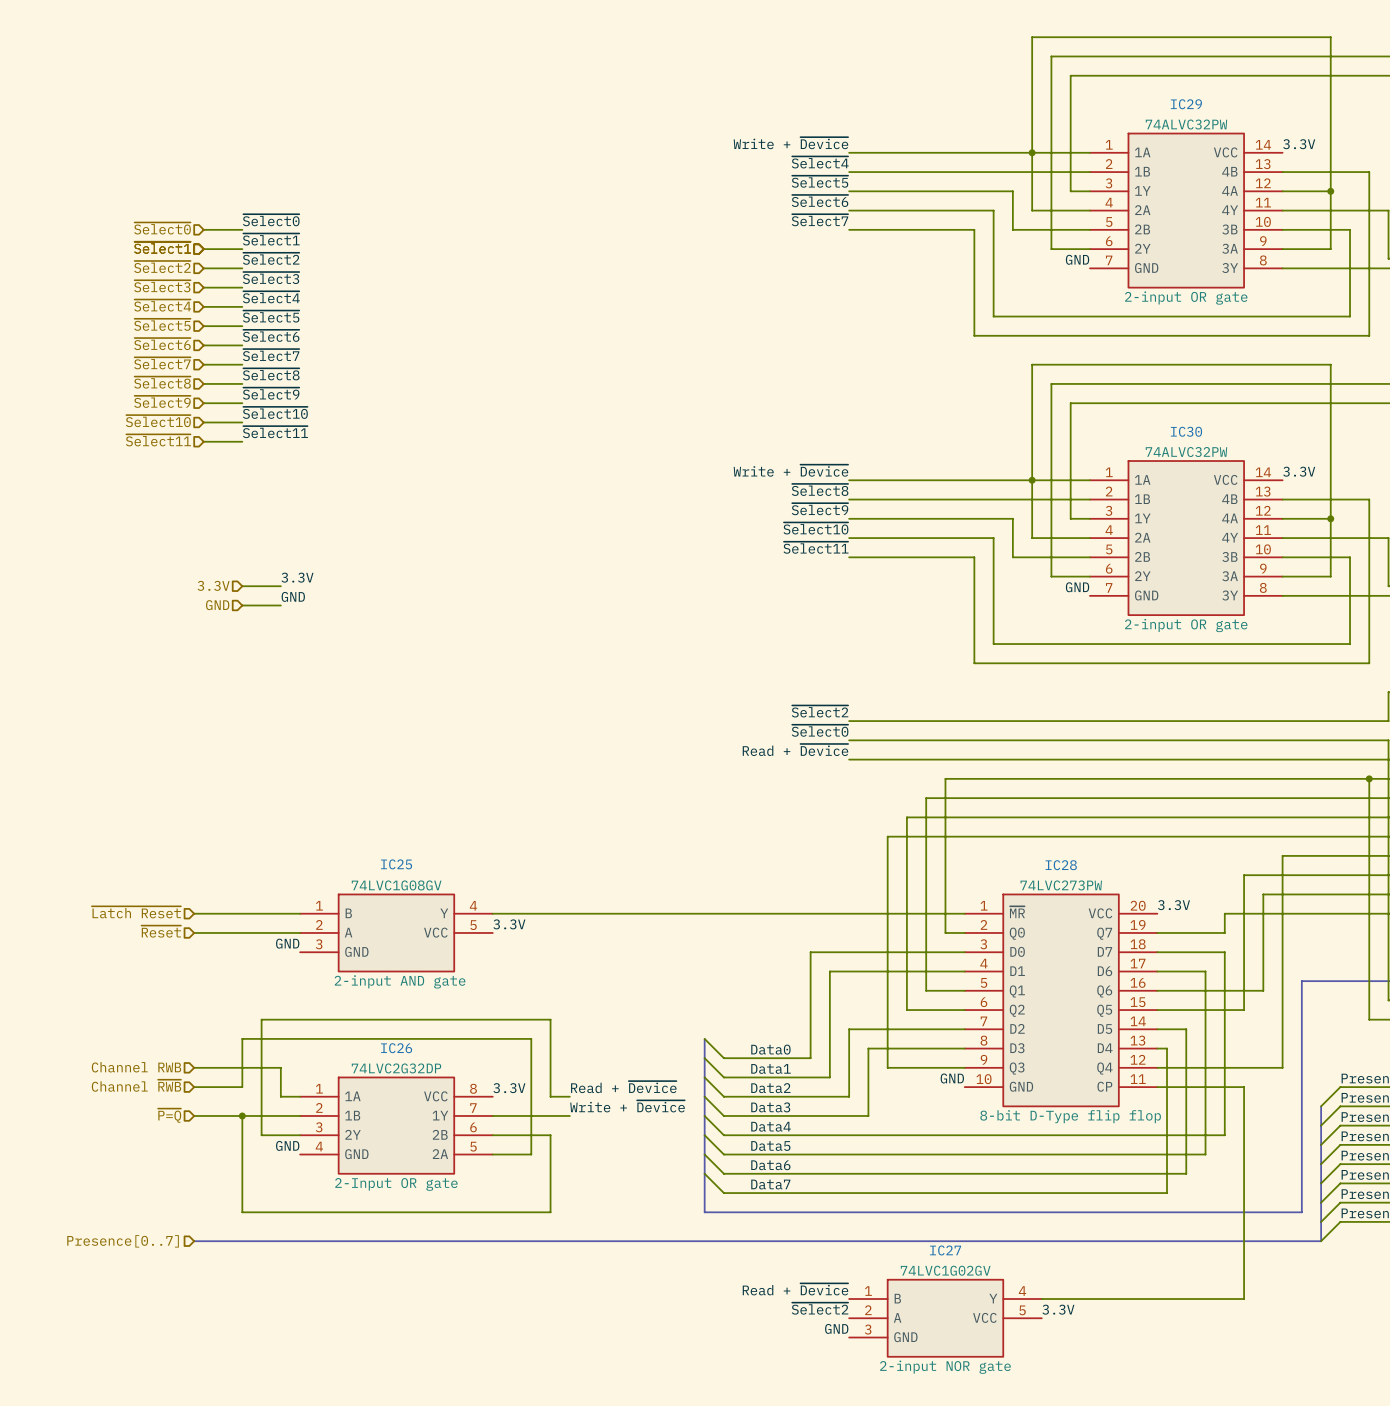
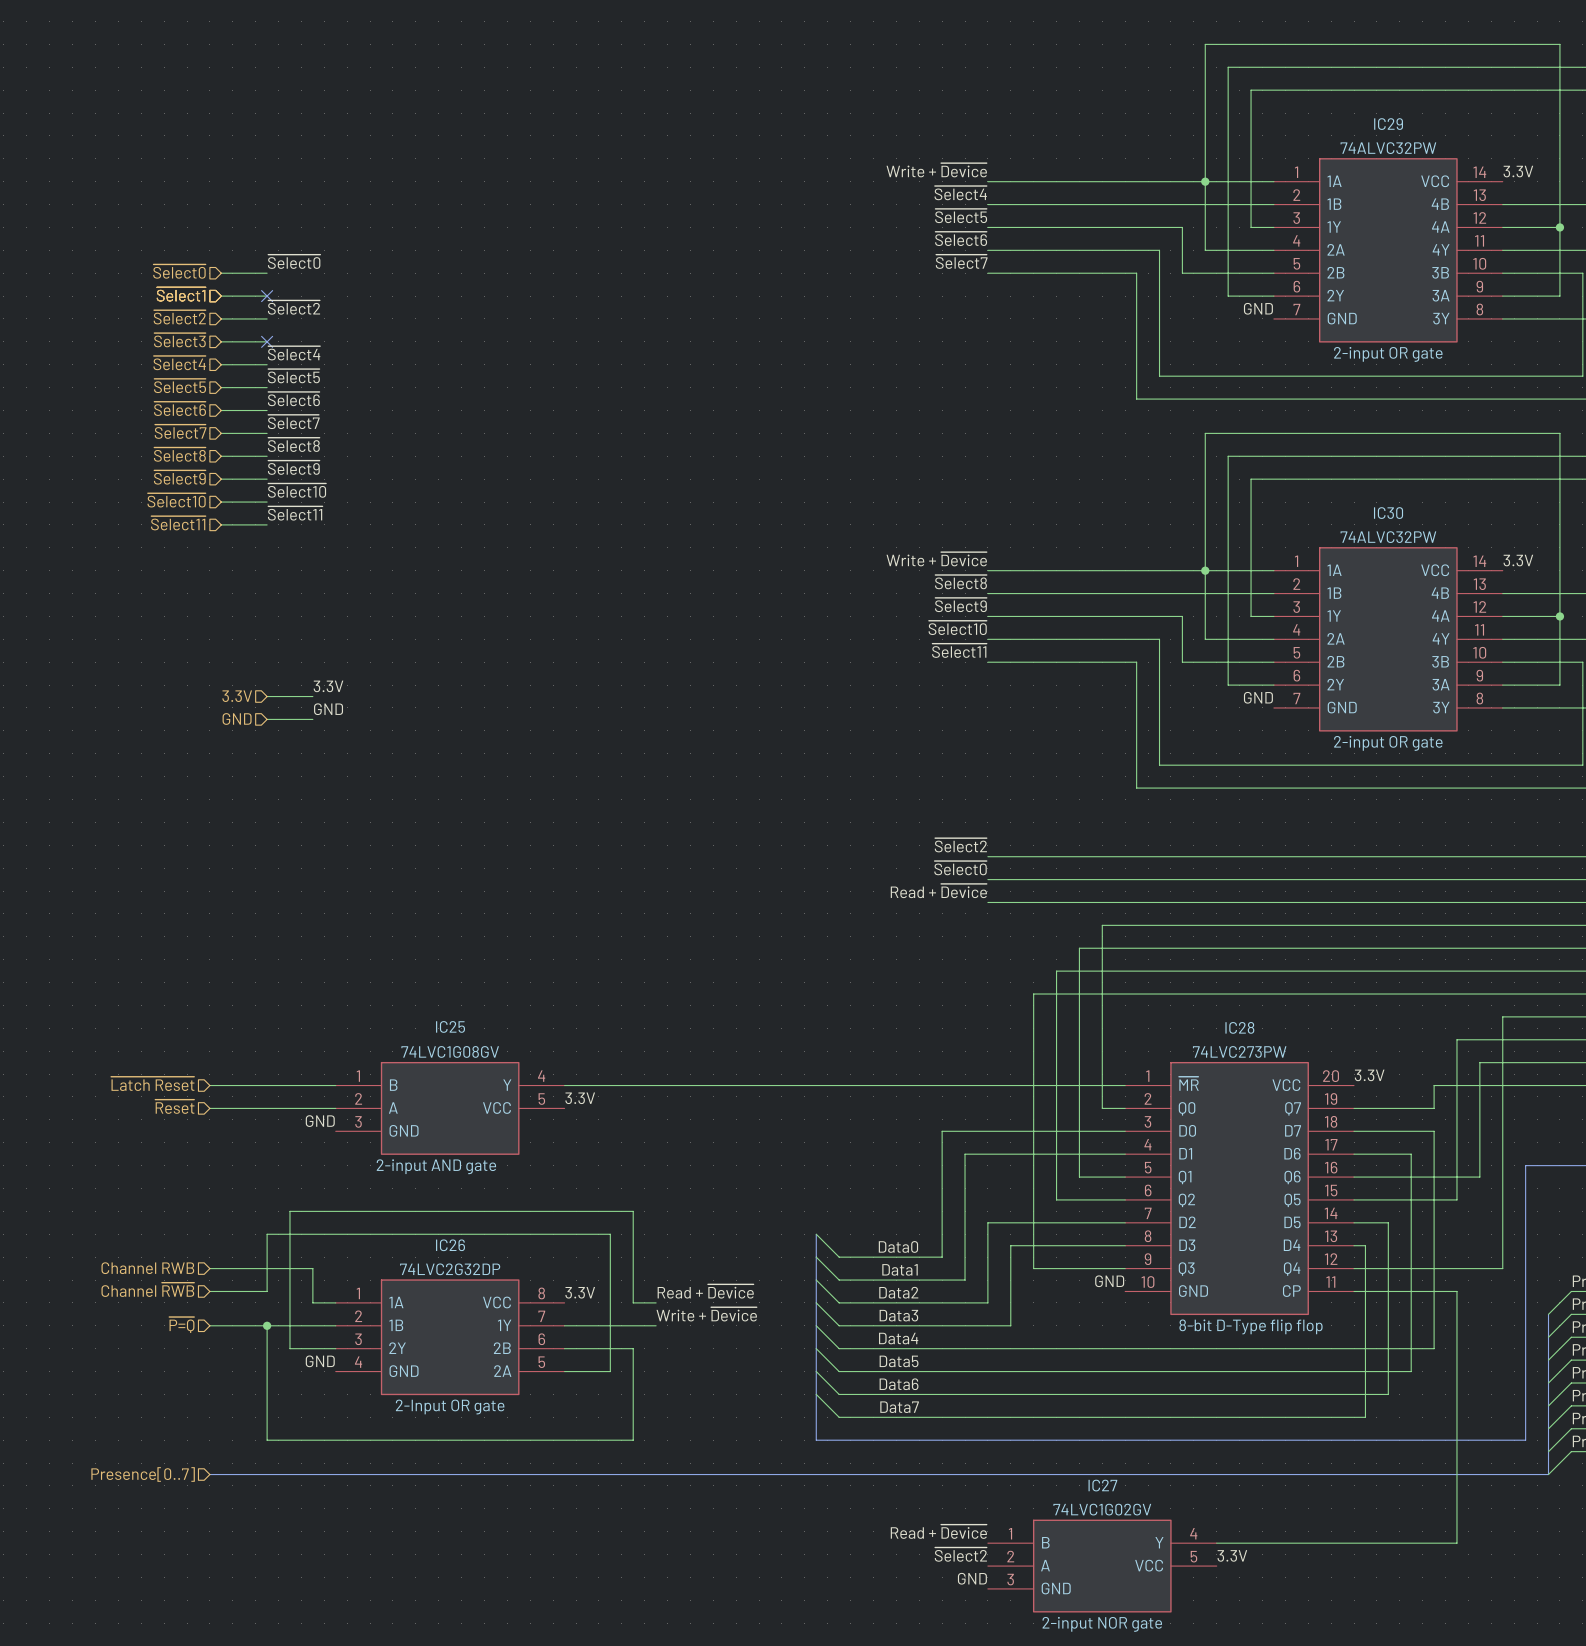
label: ~{Select1} (271, 239) -> none
no-connect mark: none -> (267, 296)
label: ~{Select3} (271, 278) -> none
no-connect mark: none -> (267, 341)

